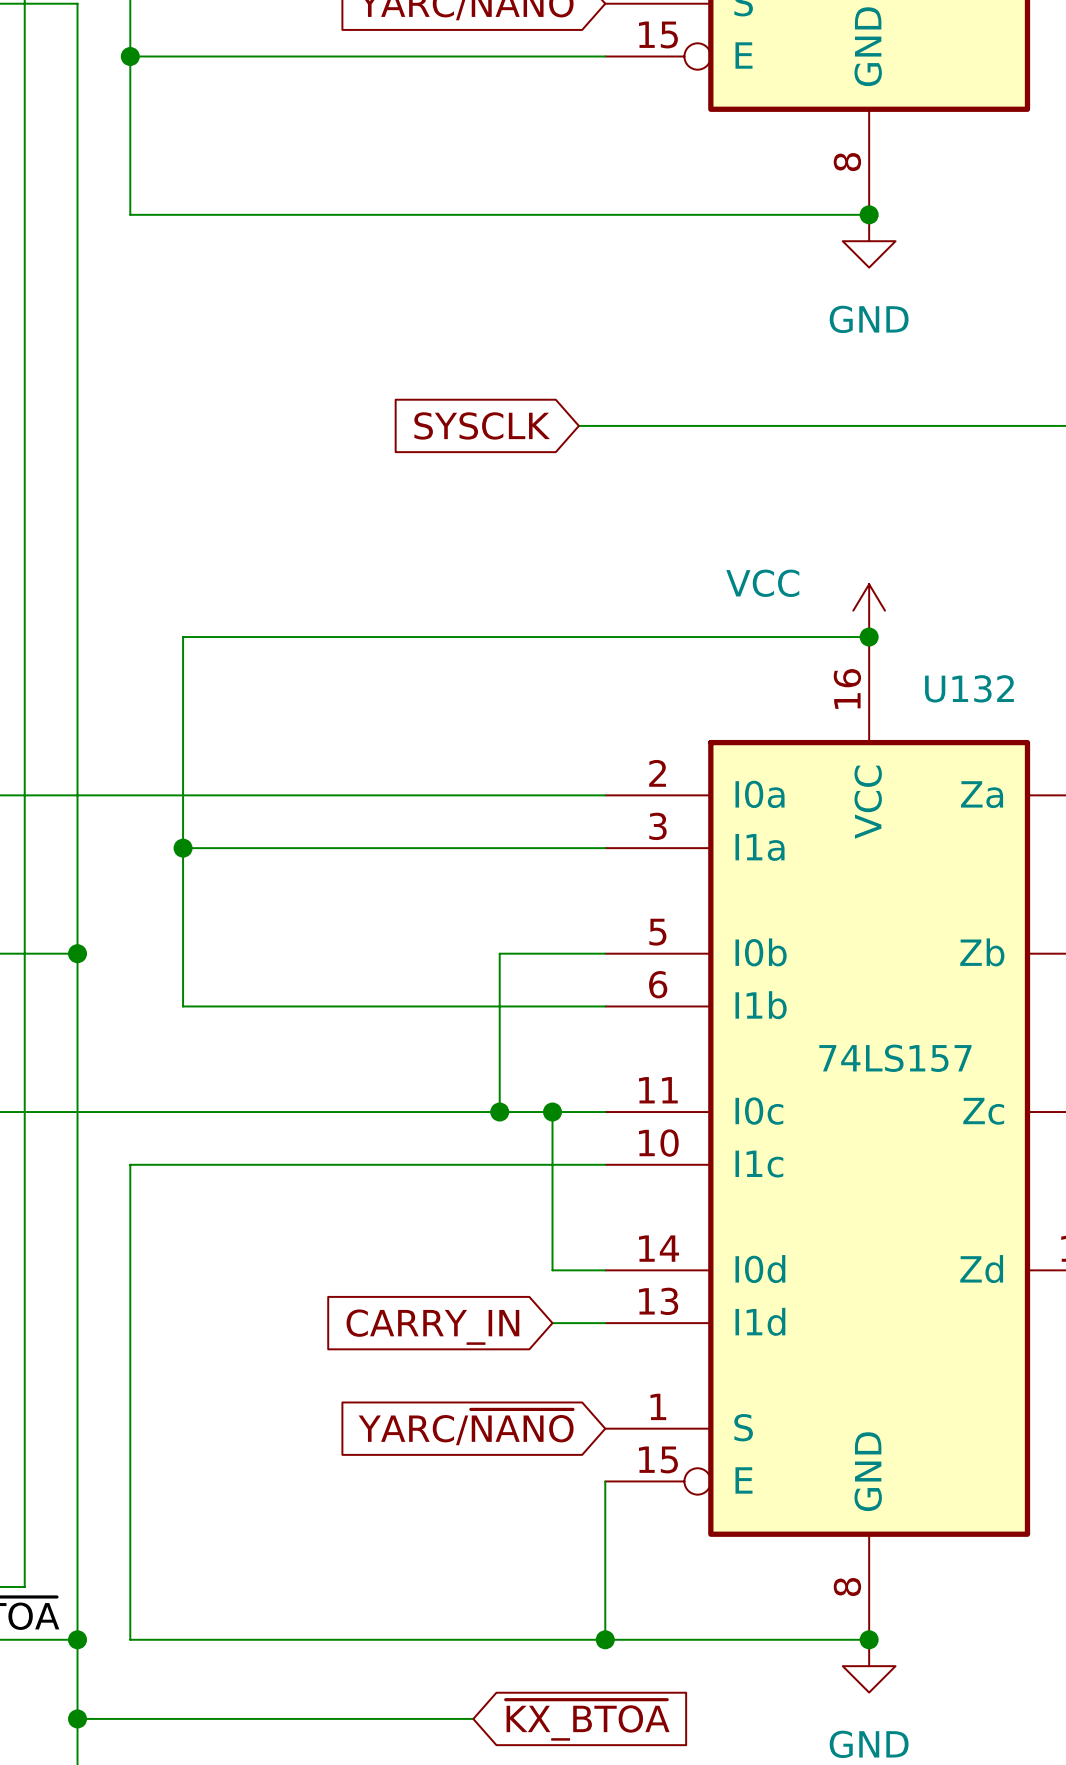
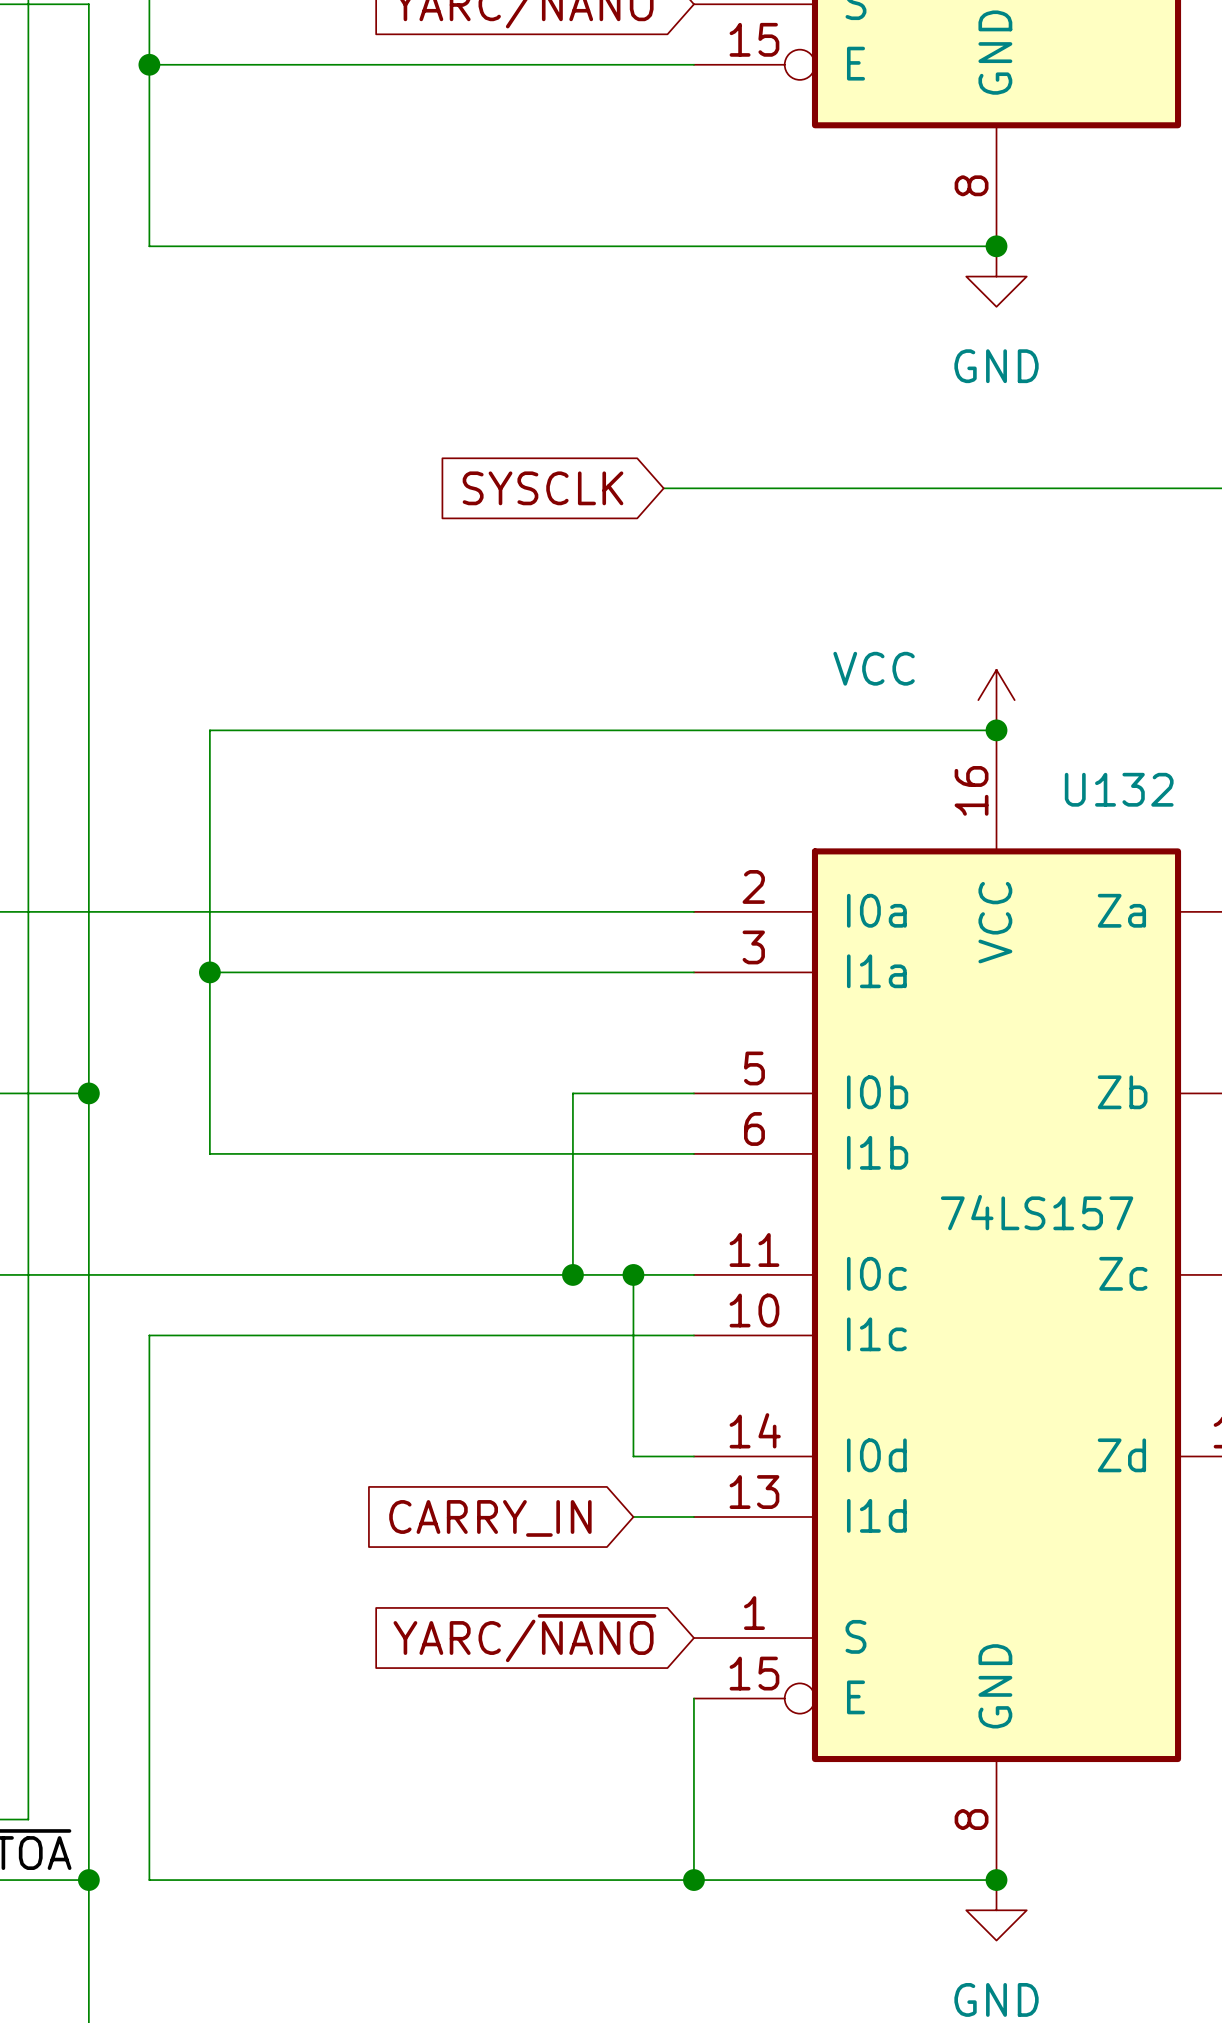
wire: (77, 1718) (473, 1718) -> none
junction: (77, 1718) -> none
global label: ~{KX_BTOA} (587, 1720) -> none

